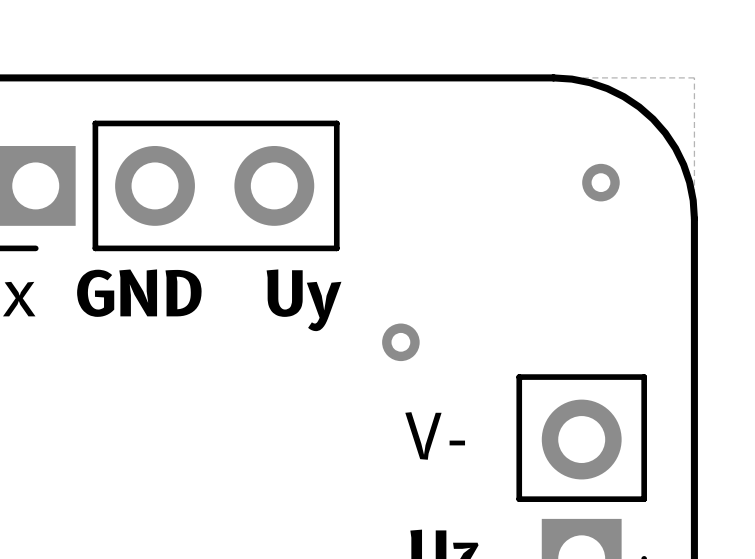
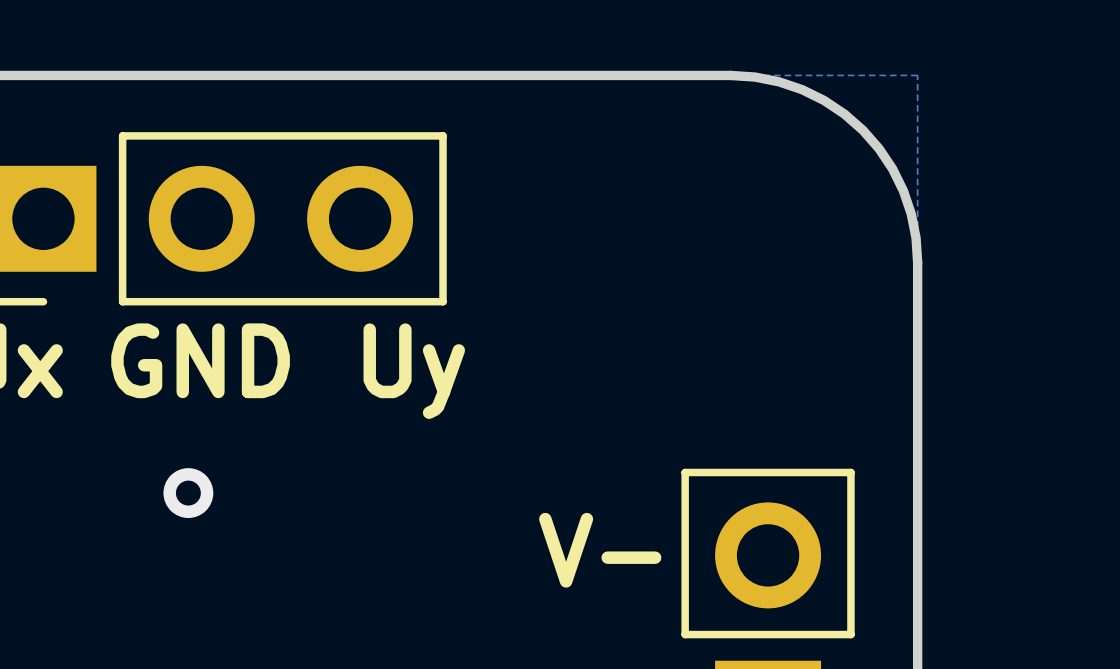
via: (600, 182) -> none
via: (400, 342) -> none
via: none -> (188, 493)

